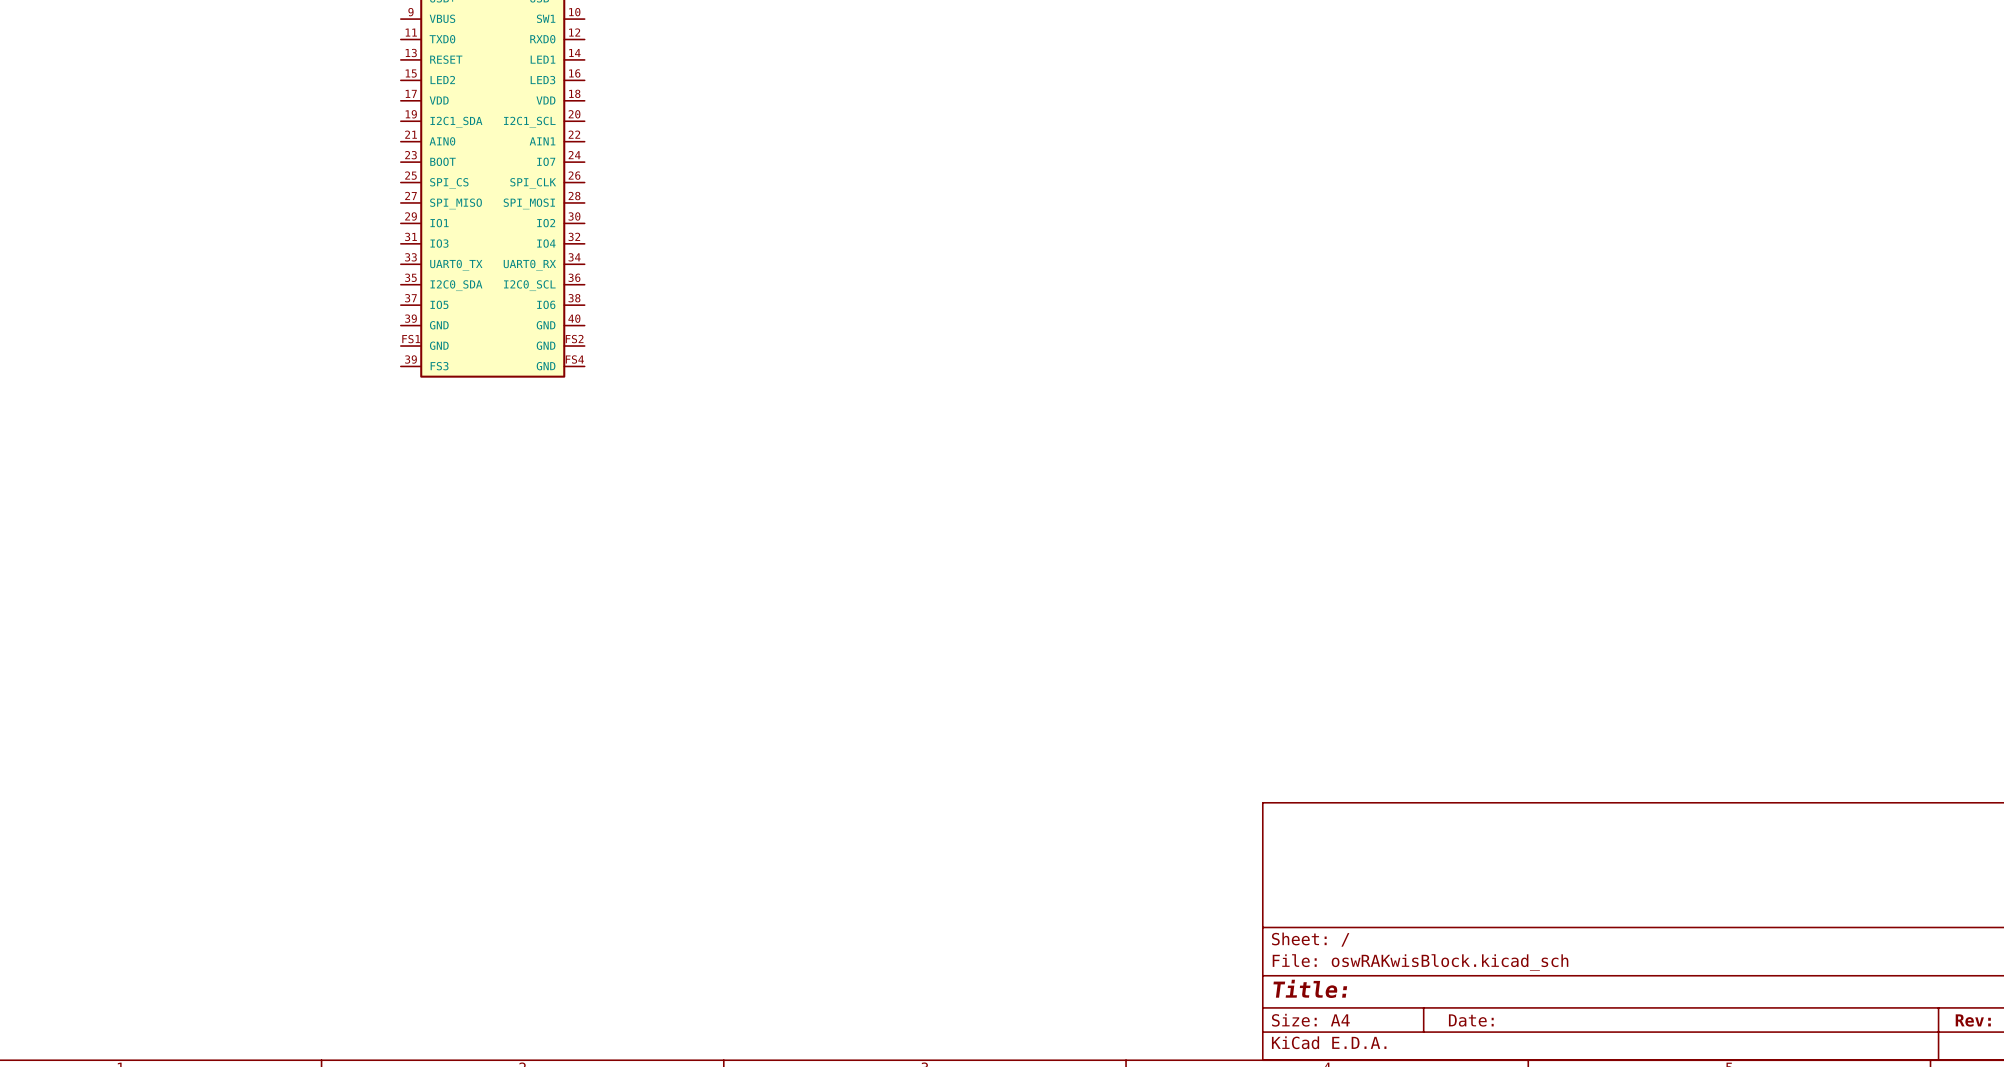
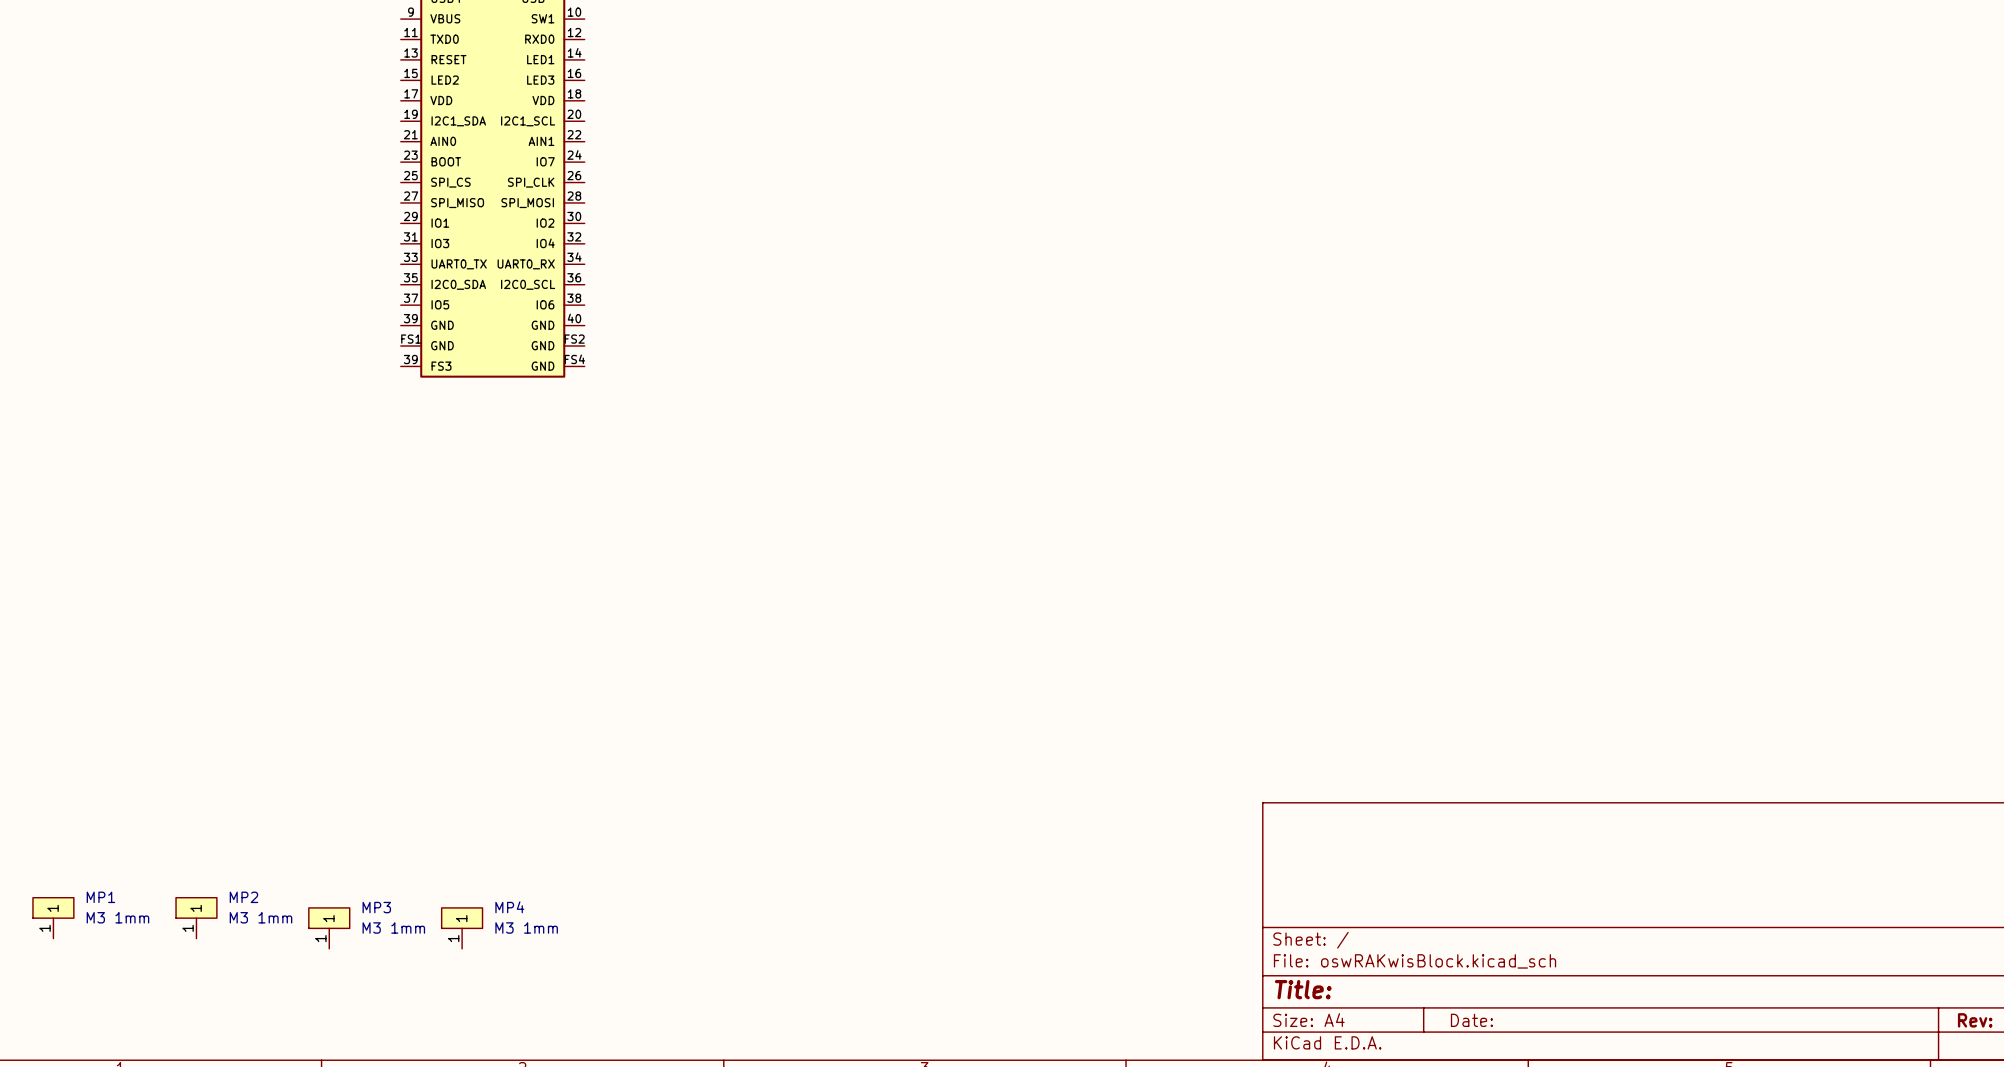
MP1: none -> M3 1mm (53, 918)
MP2: none -> M3 1mm (196, 918)
MP3: none -> M3 1mm (329, 928)
MP4: none -> M3 1mm (462, 928)

